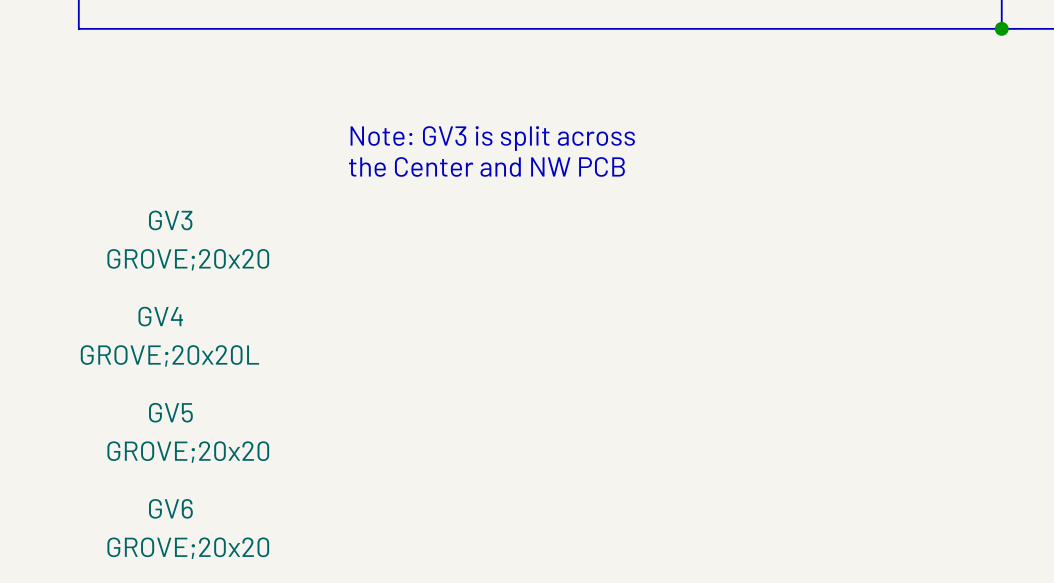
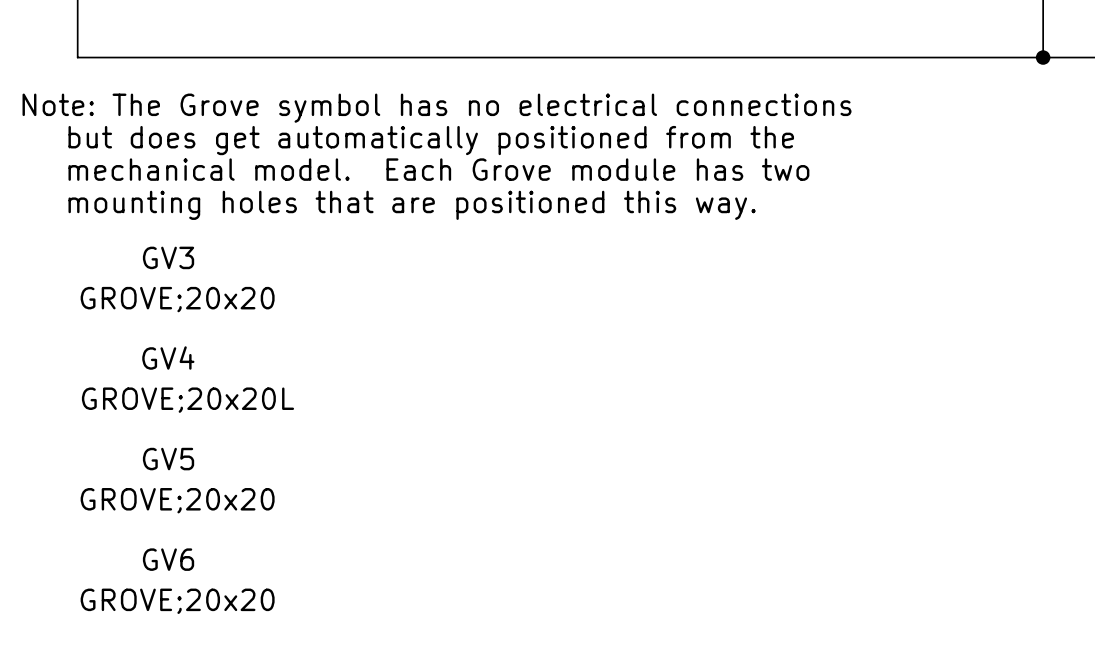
text: none -> Note: The Grove symbol has no electrical connections (437, 108)
text: none -> but does get automatically positioned from the (431, 140)
text: none -> mechanical model. Each Grove module has two (438, 169)
text: Note: GV3 is split across (492, 138) -> none
text: the Center and NW PCB (486, 166) -> none
text: none -> mounting holes that are positioned this way. (412, 205)

